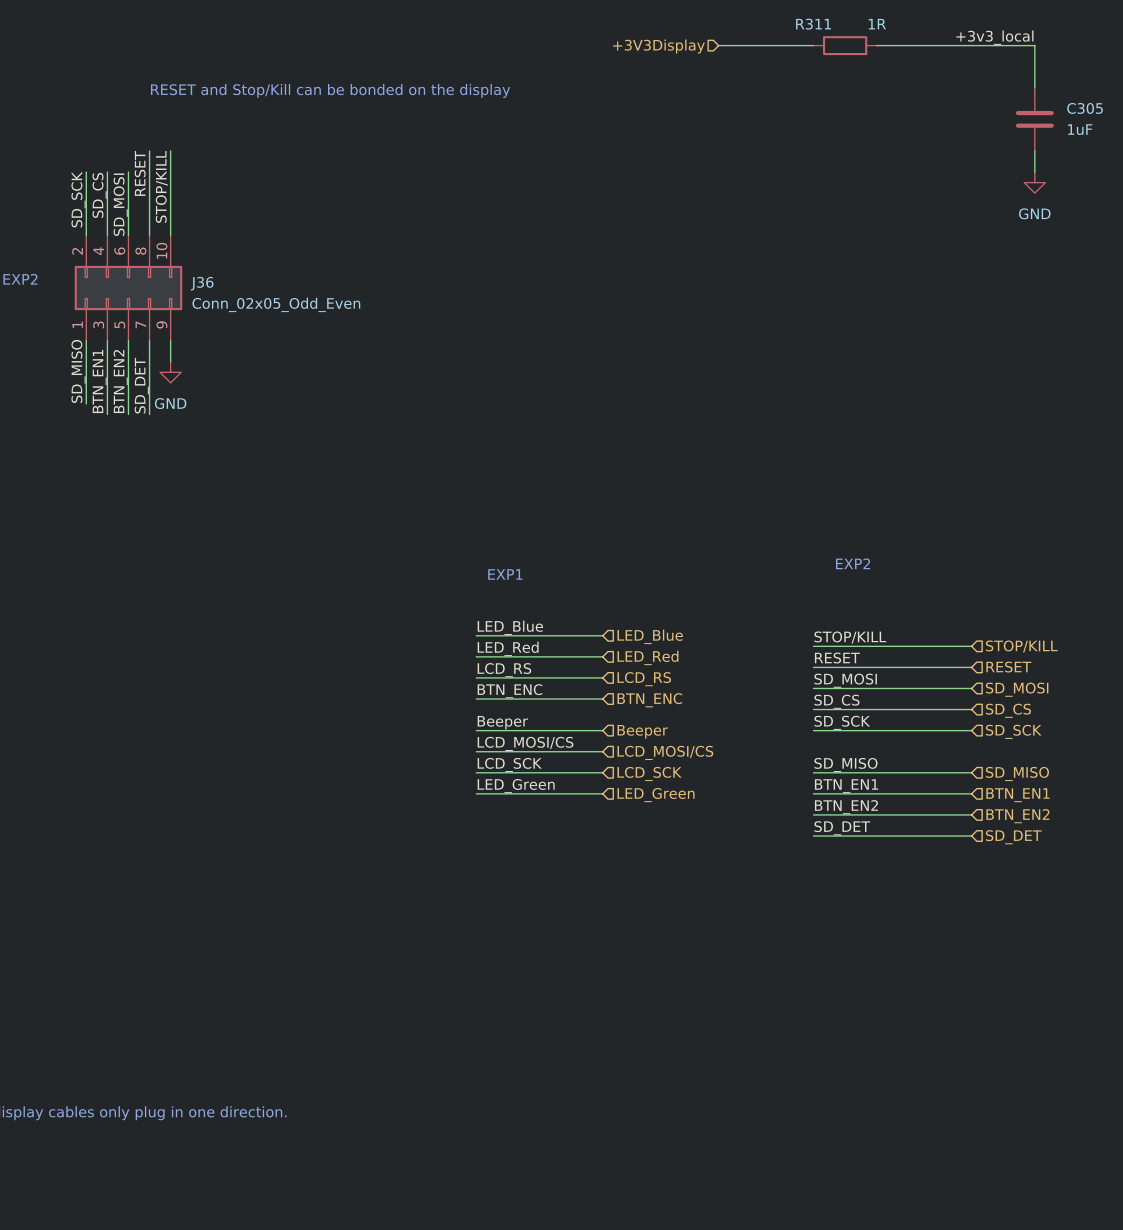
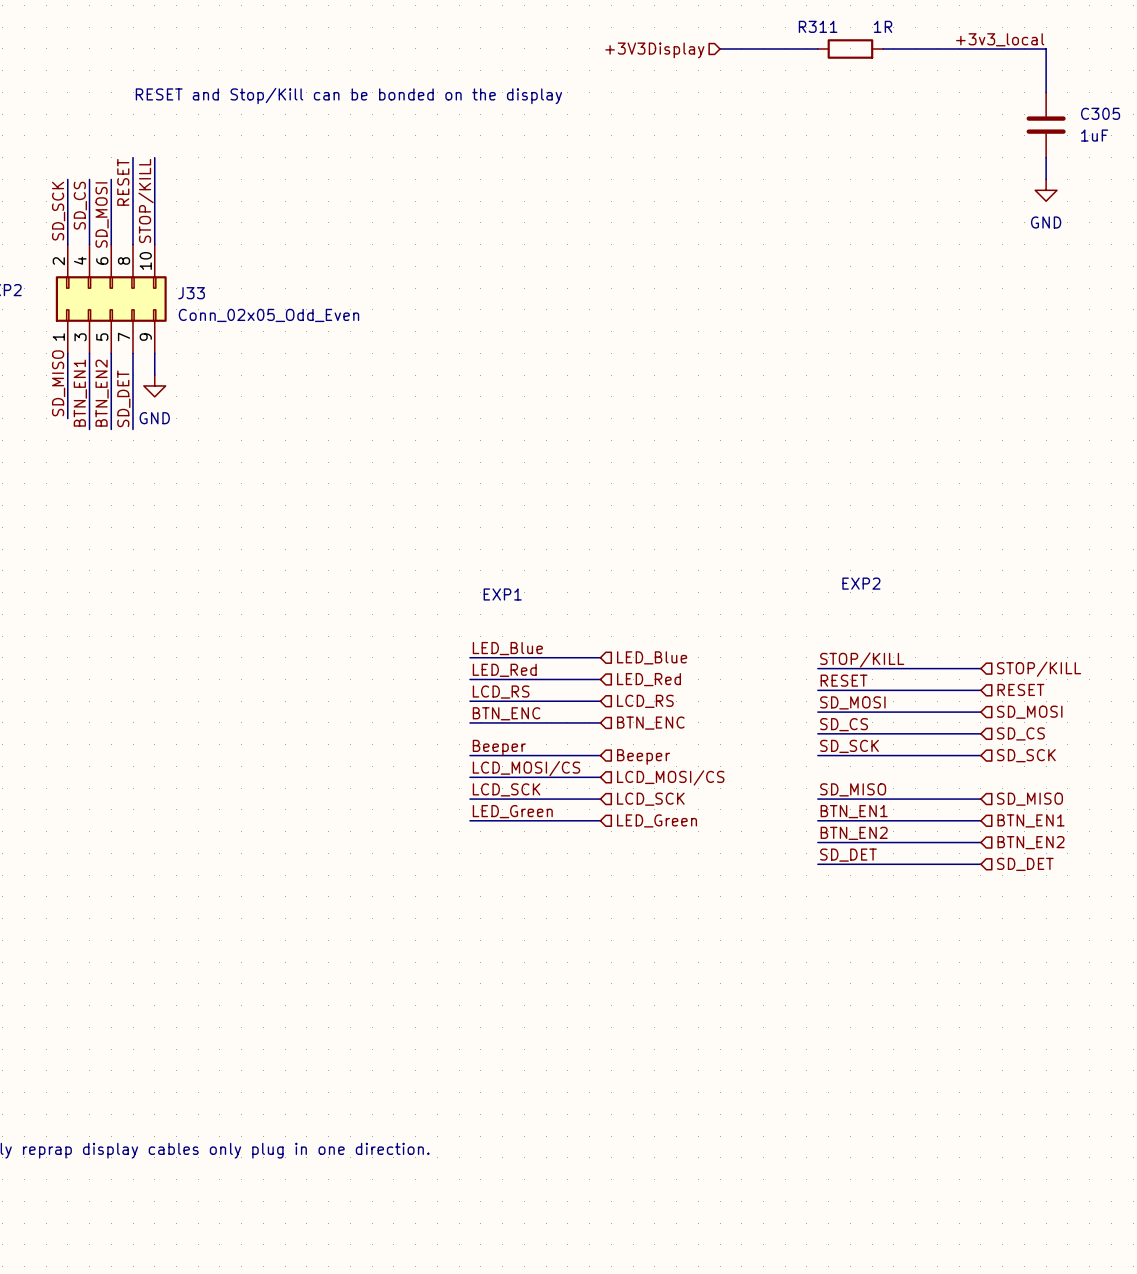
J36 name: J36 (202, 283) -> J33 (191, 293)

